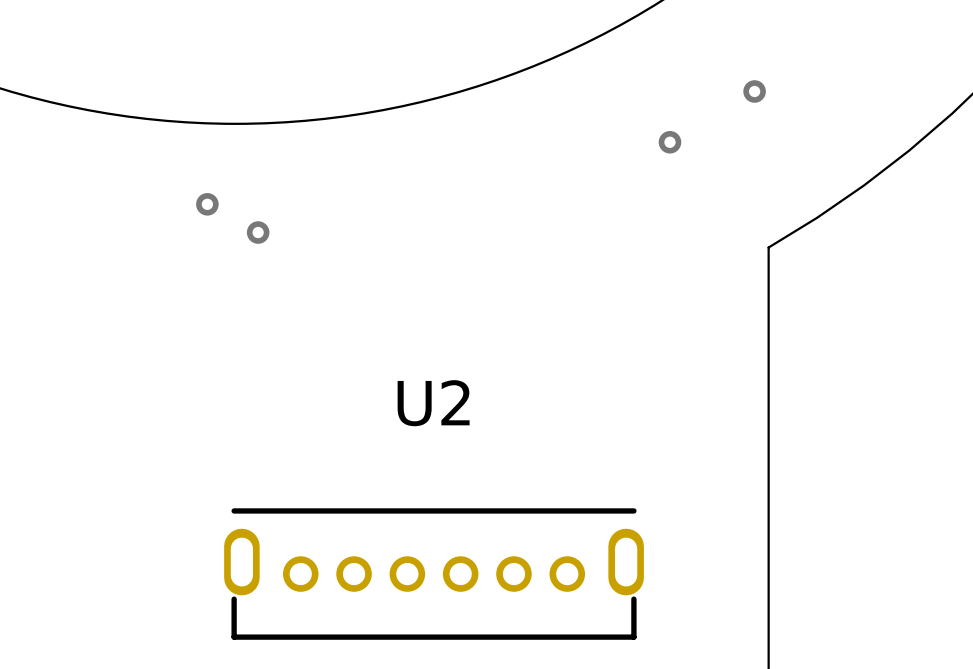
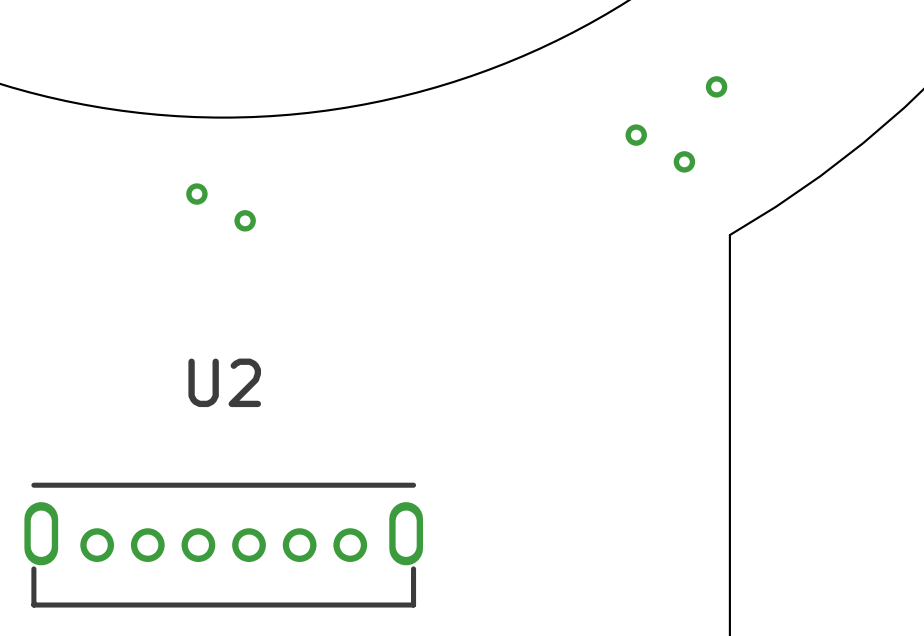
via: none -> (684, 161)
U2 position: (434, 574) -> (223, 545)

